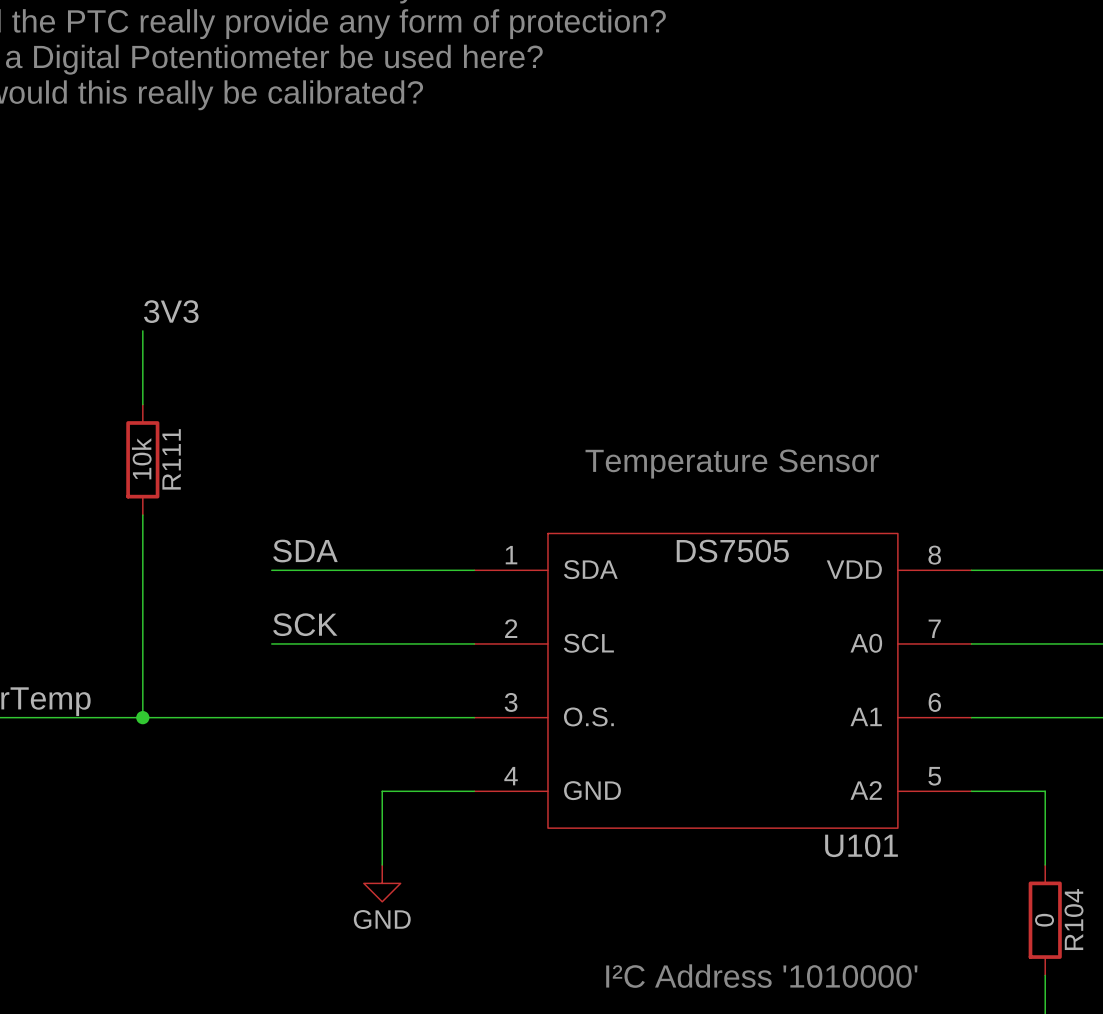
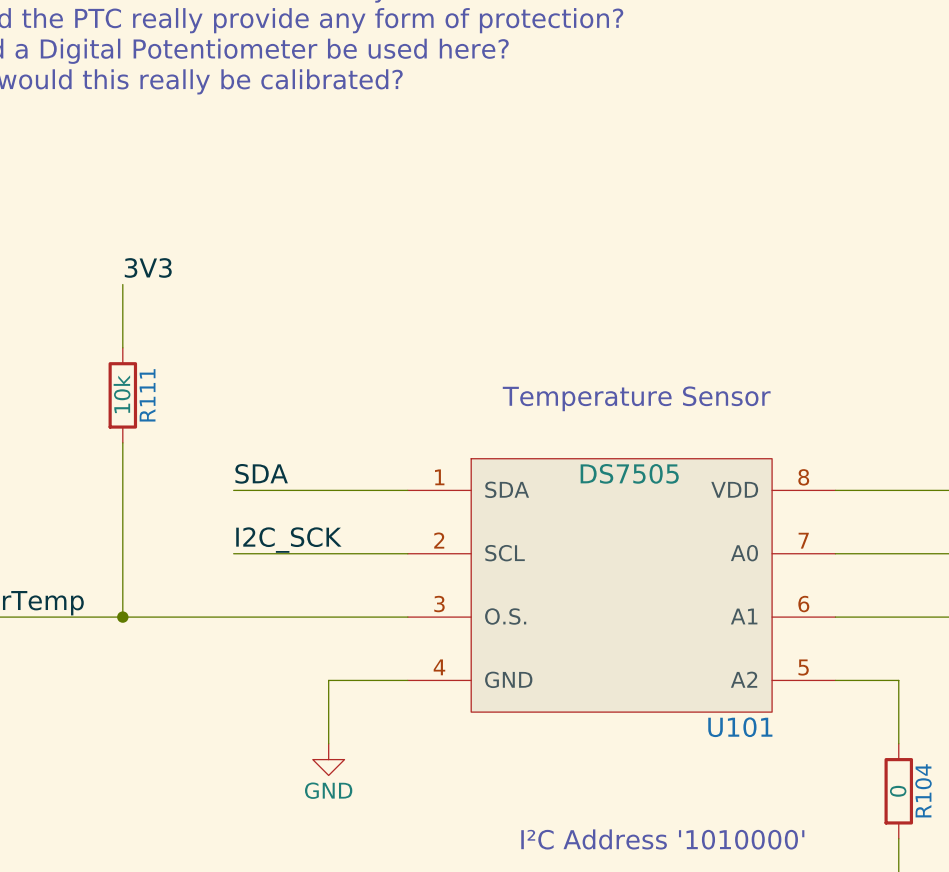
label: SCK (305, 624) -> I2C_SCK (288, 540)

